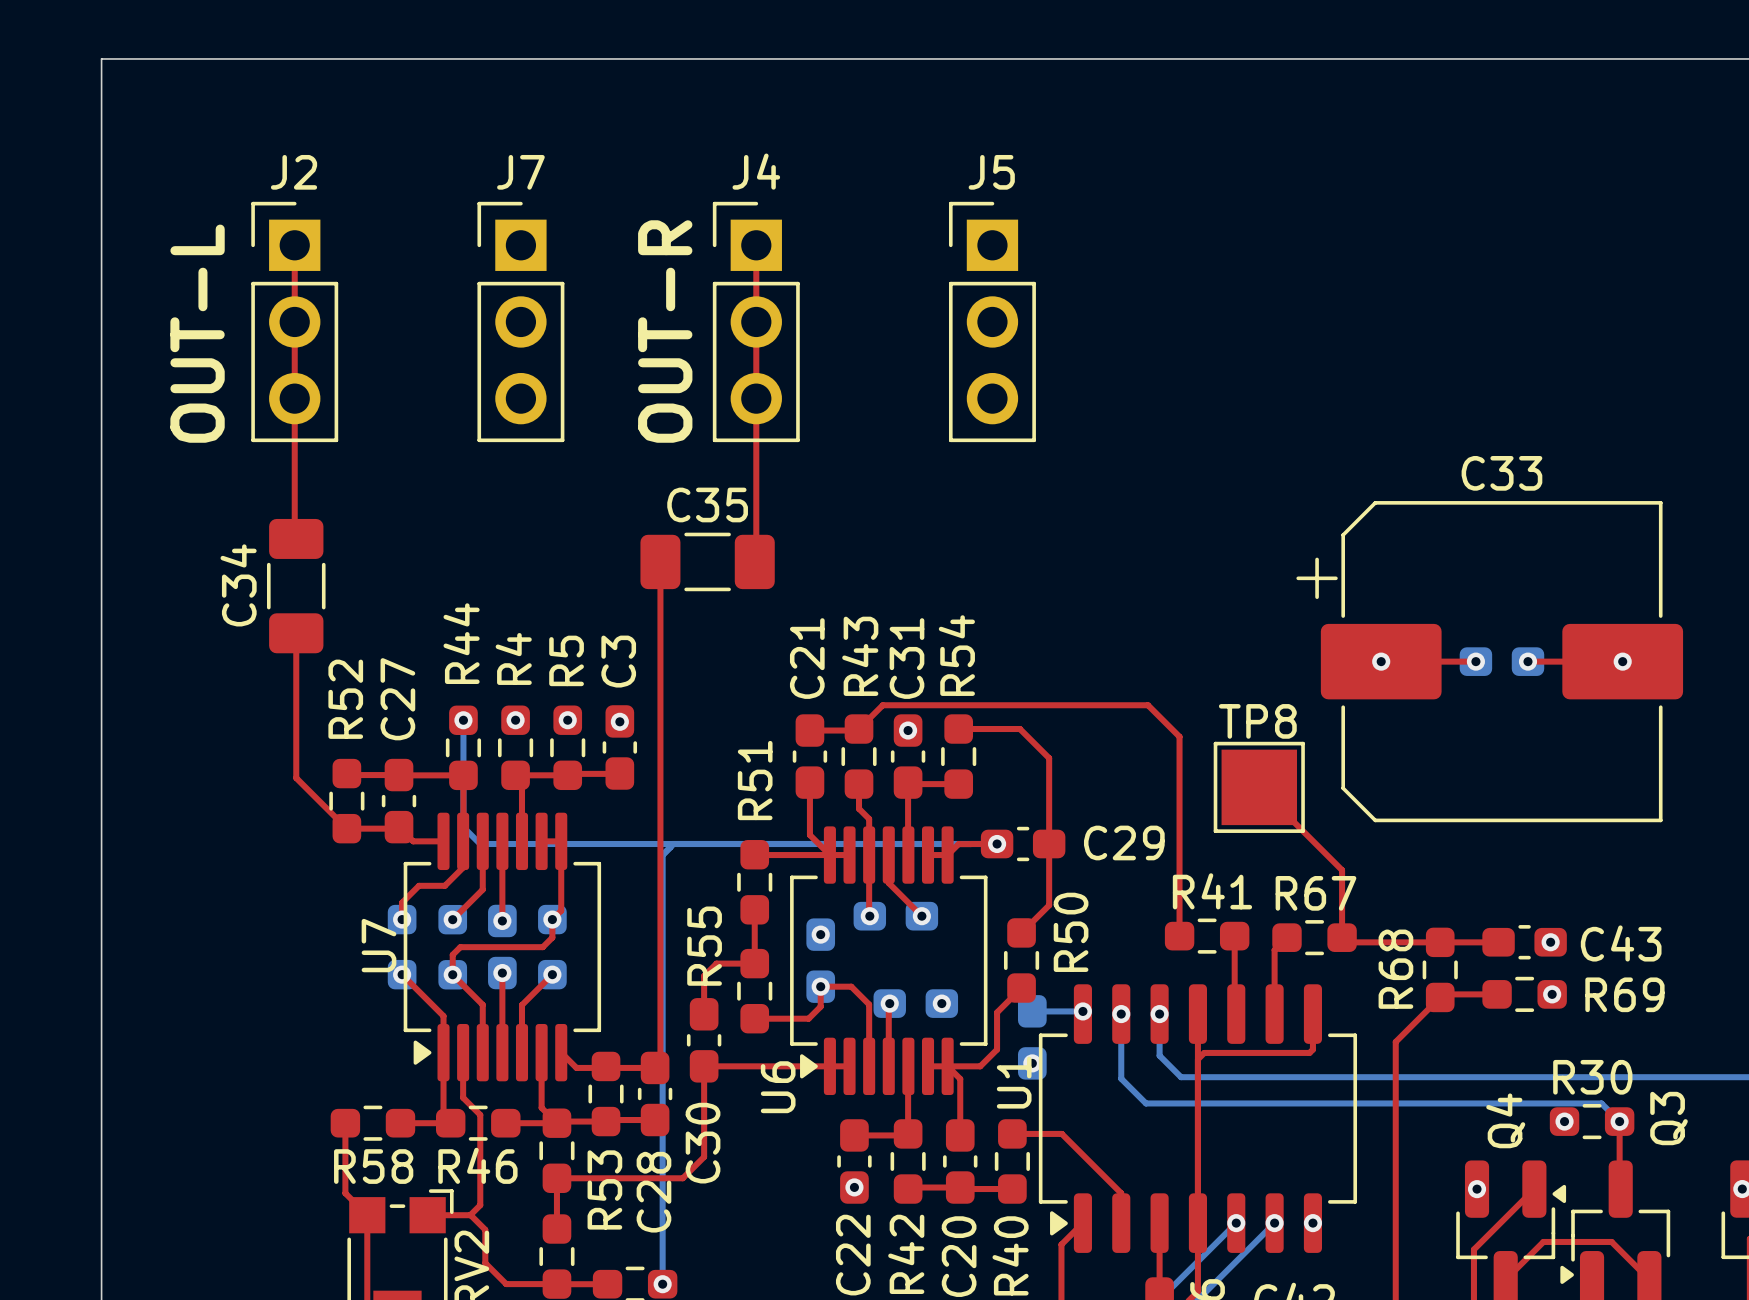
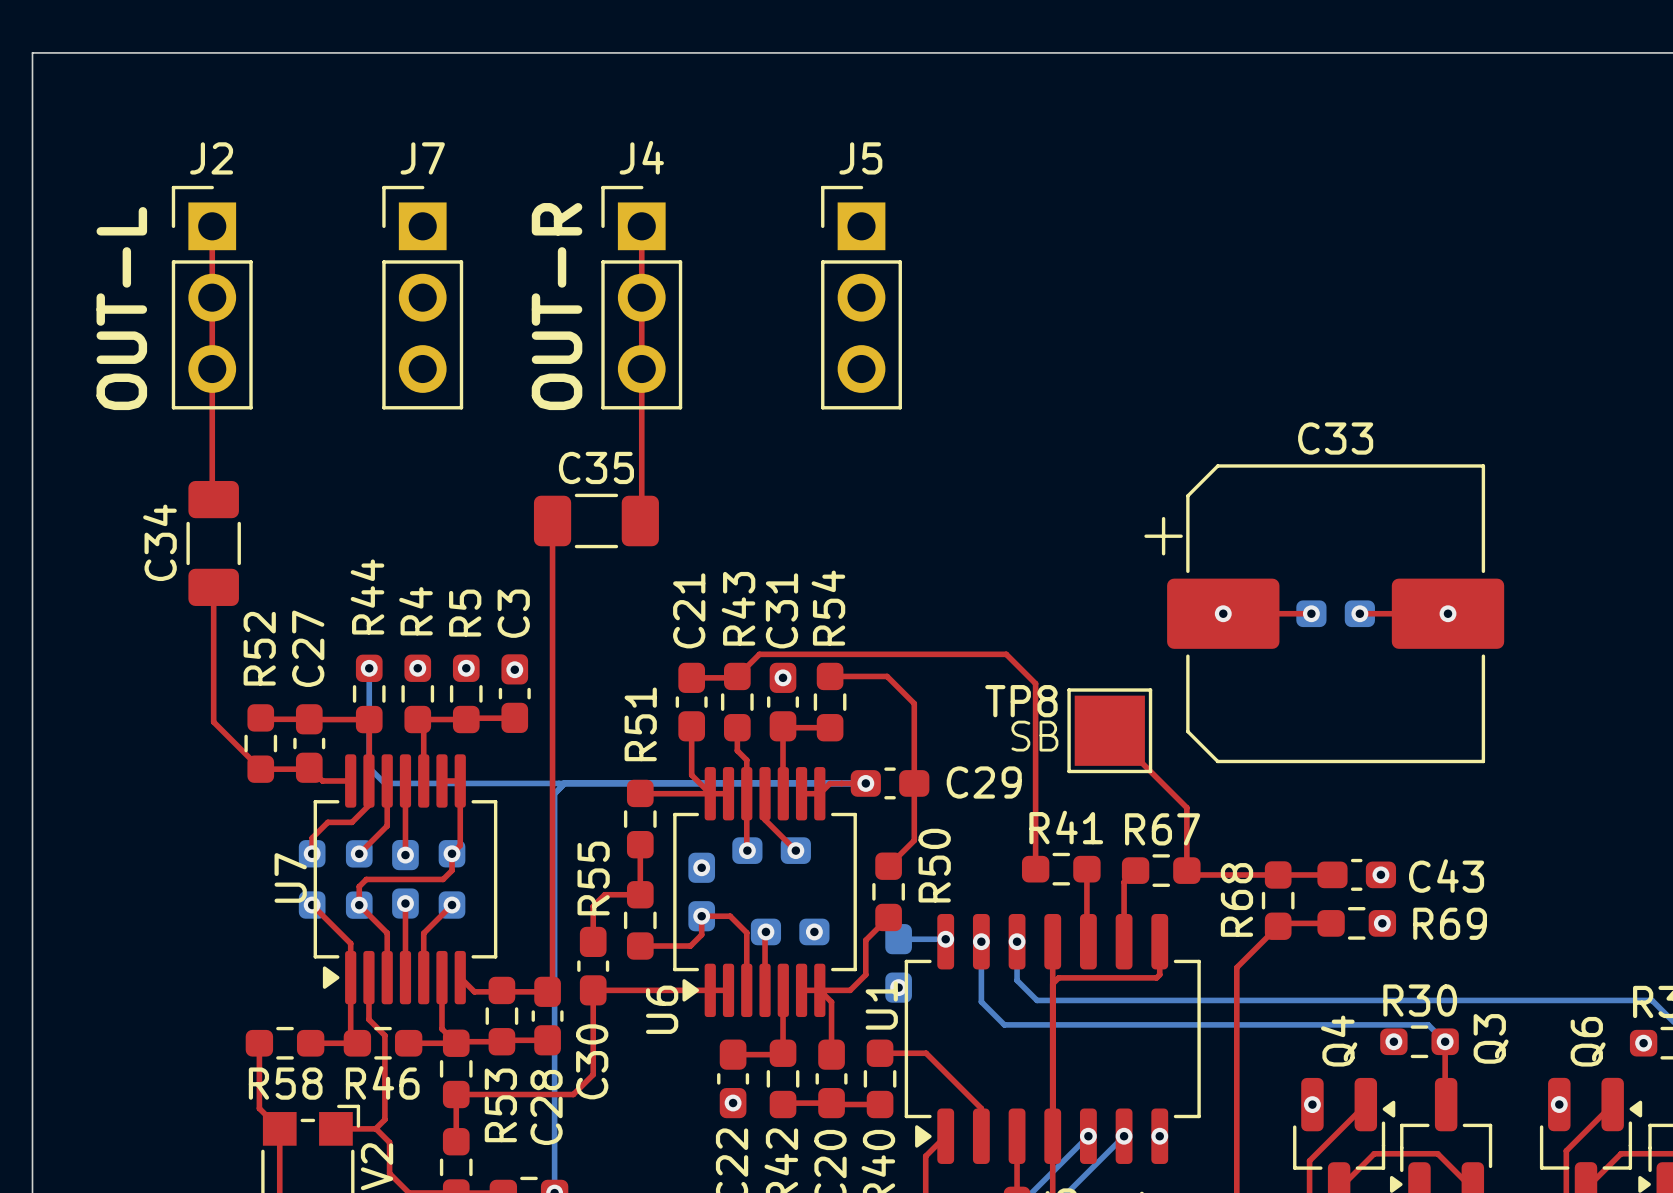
TP8 name position: TP8 (1257, 721) -> TP8 (1021, 701)
text: none -> SB (1034, 736)

